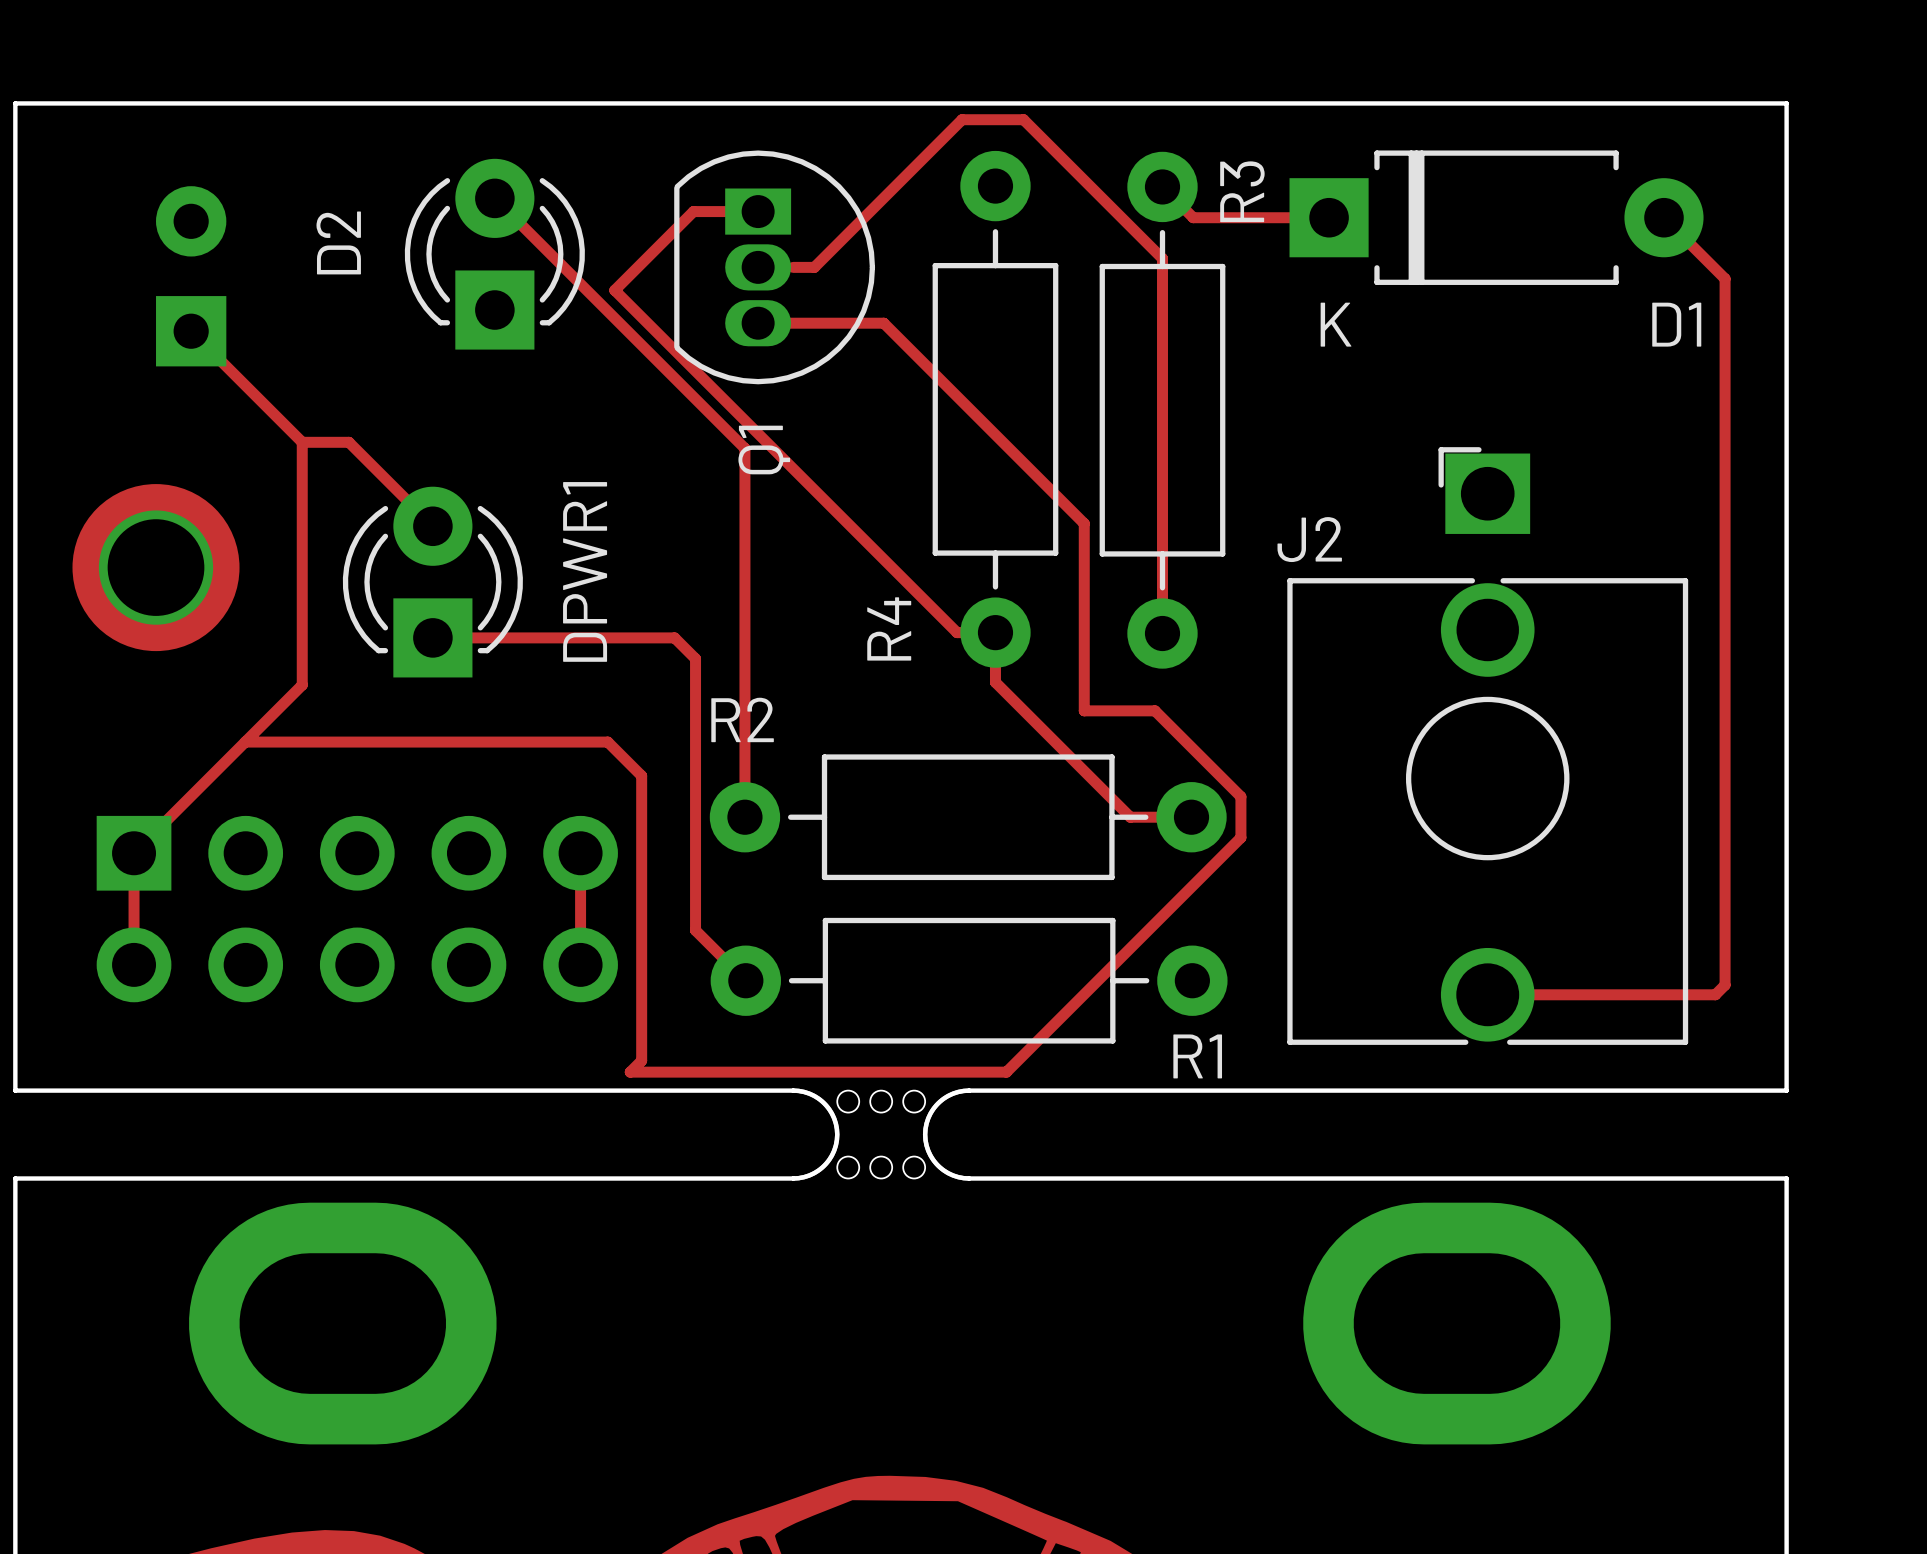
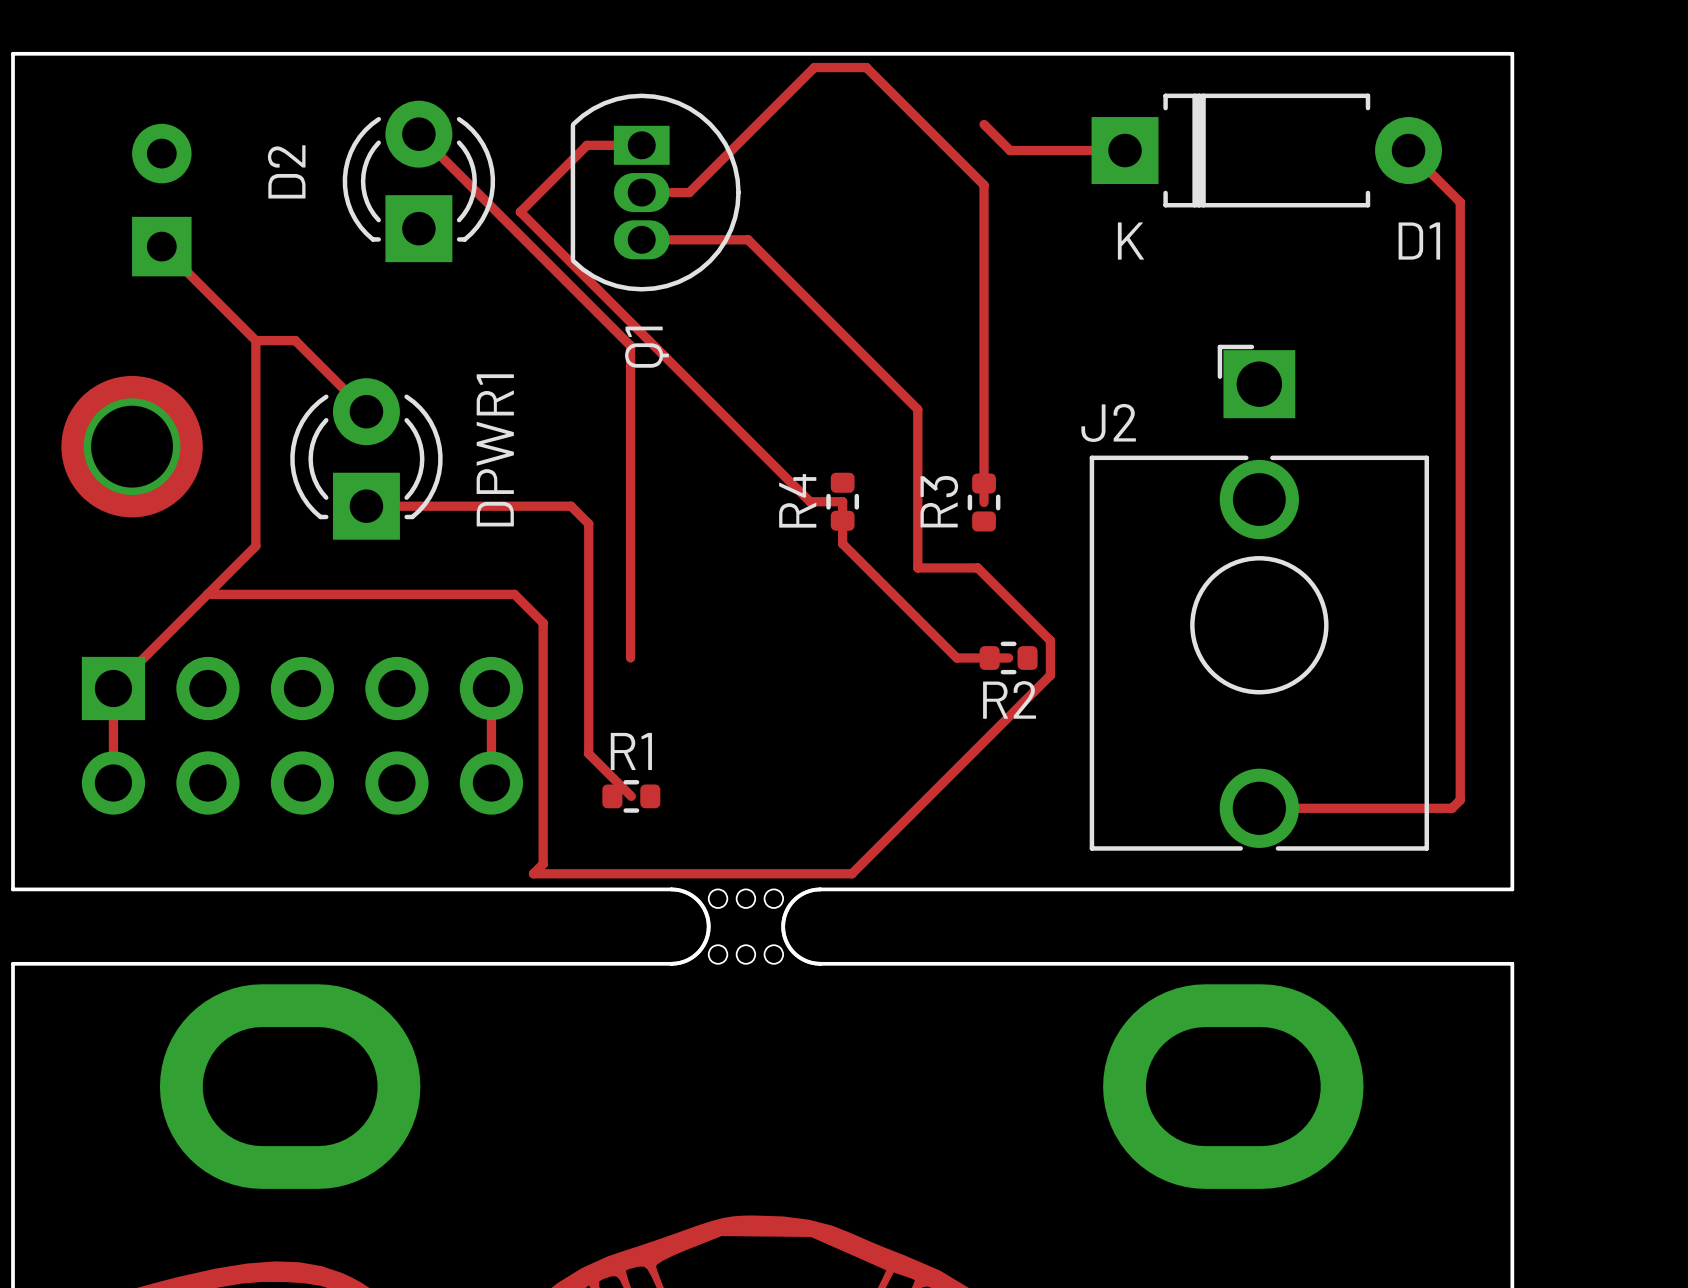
R4 footprint: [932, 150, 1059, 668] -> [826, 472, 860, 531]
R3 footprint: [1099, 151, 1226, 669] -> [967, 473, 1001, 532]
R3 name position: R3 (1242, 191) -> R3 (939, 501)
R4 name position: R4 (889, 628) -> R4 (797, 500)
R2 name position: R2 (742, 719) -> R2 (1009, 699)
R2 footprint: [709, 754, 1227, 881] -> [979, 641, 1038, 675]
R1 footprint: [710, 917, 1228, 1044] -> [602, 780, 661, 813]
R1 name position: R1 (1197, 1056) -> R1 (631, 751)

